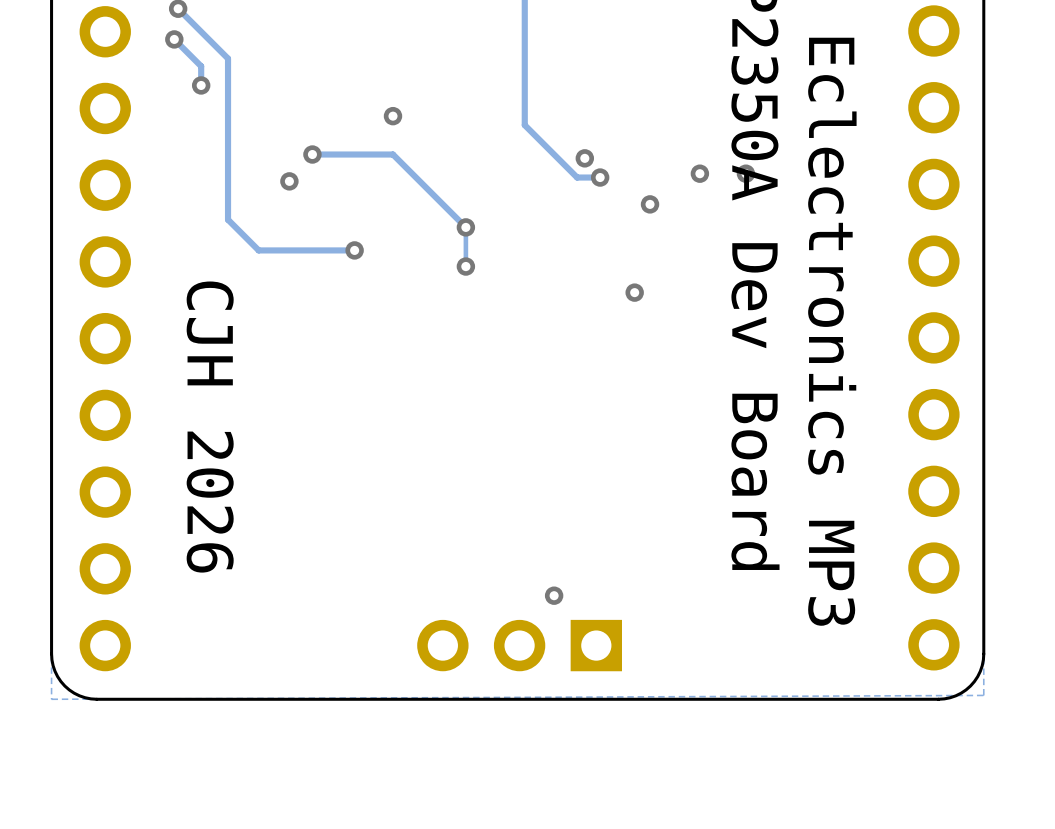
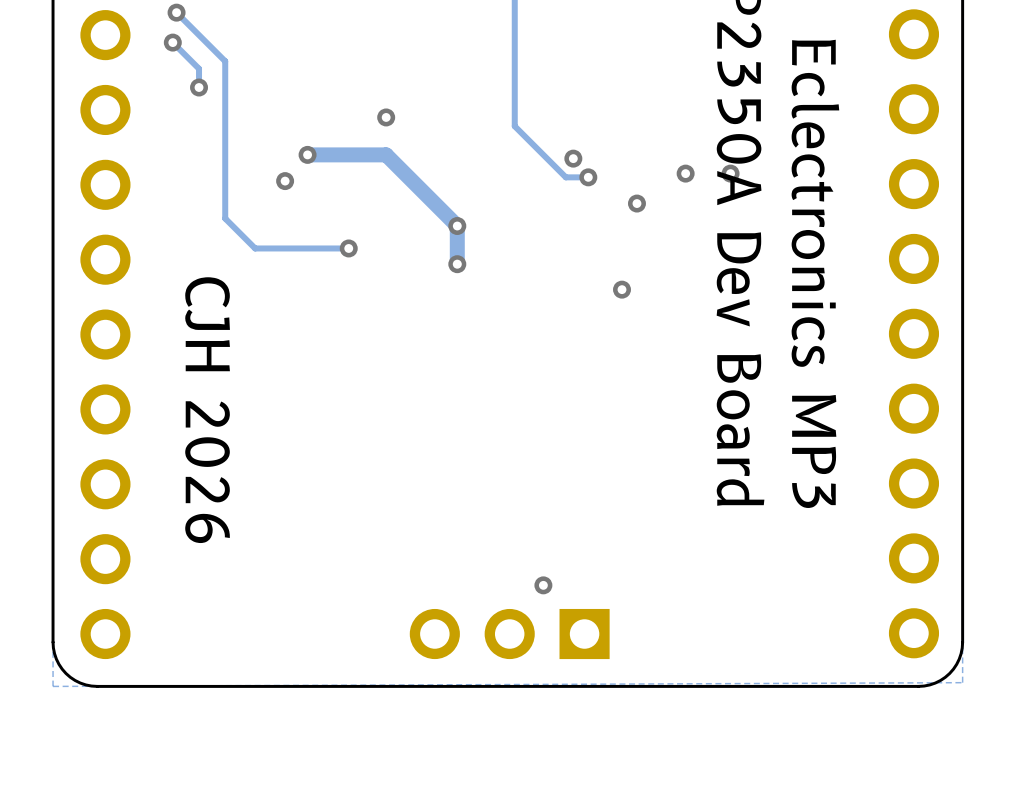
track width: thin (312, 154) (392, 154) (465, 227) (465, 266) -> thick (307, 154) (386, 154) (457, 226) (457, 264)

